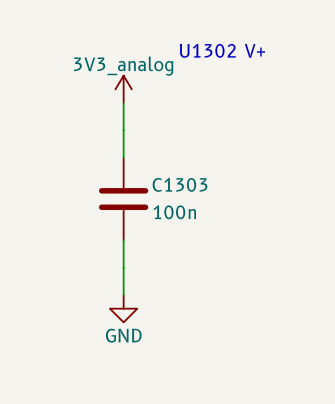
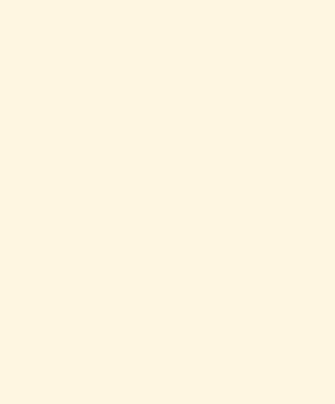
text: U1302 V+ (222, 50) -> none
power symbol: 3V3_analog (123, 89) -> none
wire: (123, 103) (123, 157) -> none
C1303: 100n (123, 199) -> none
wire: (123, 240) (123, 294) -> none
power symbol: GND (123, 308) -> none

